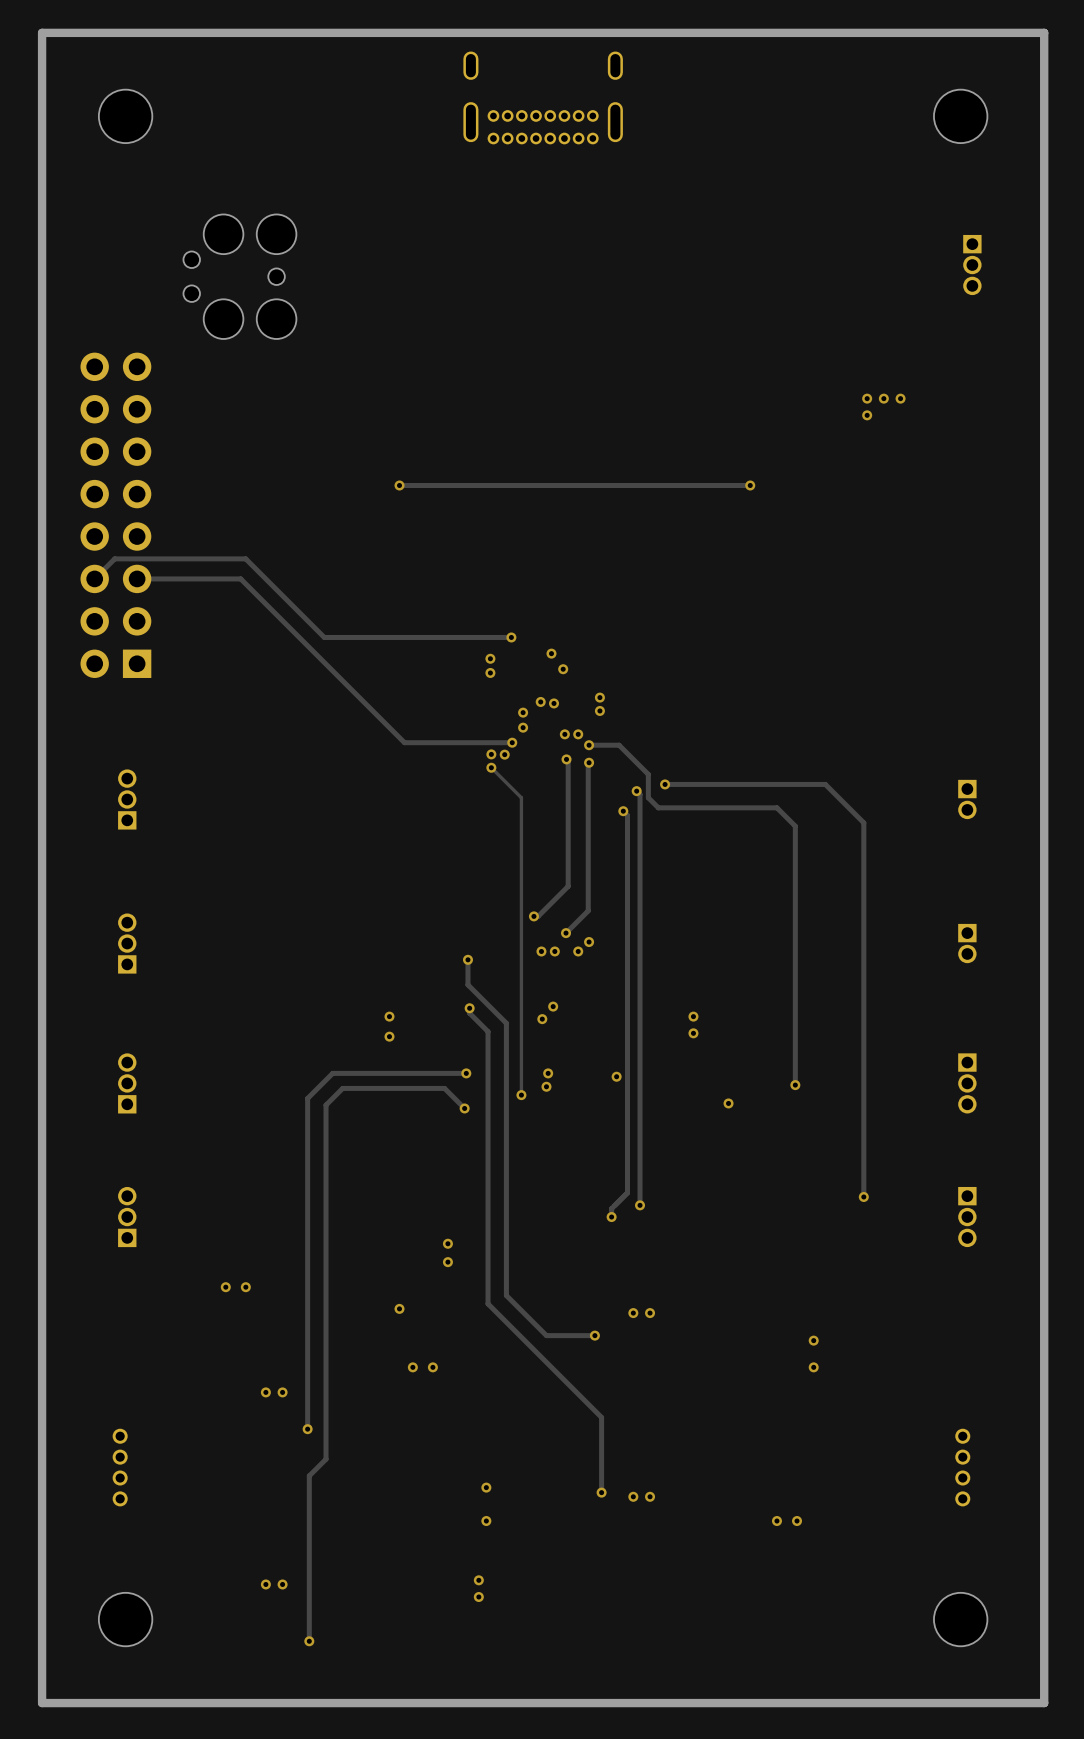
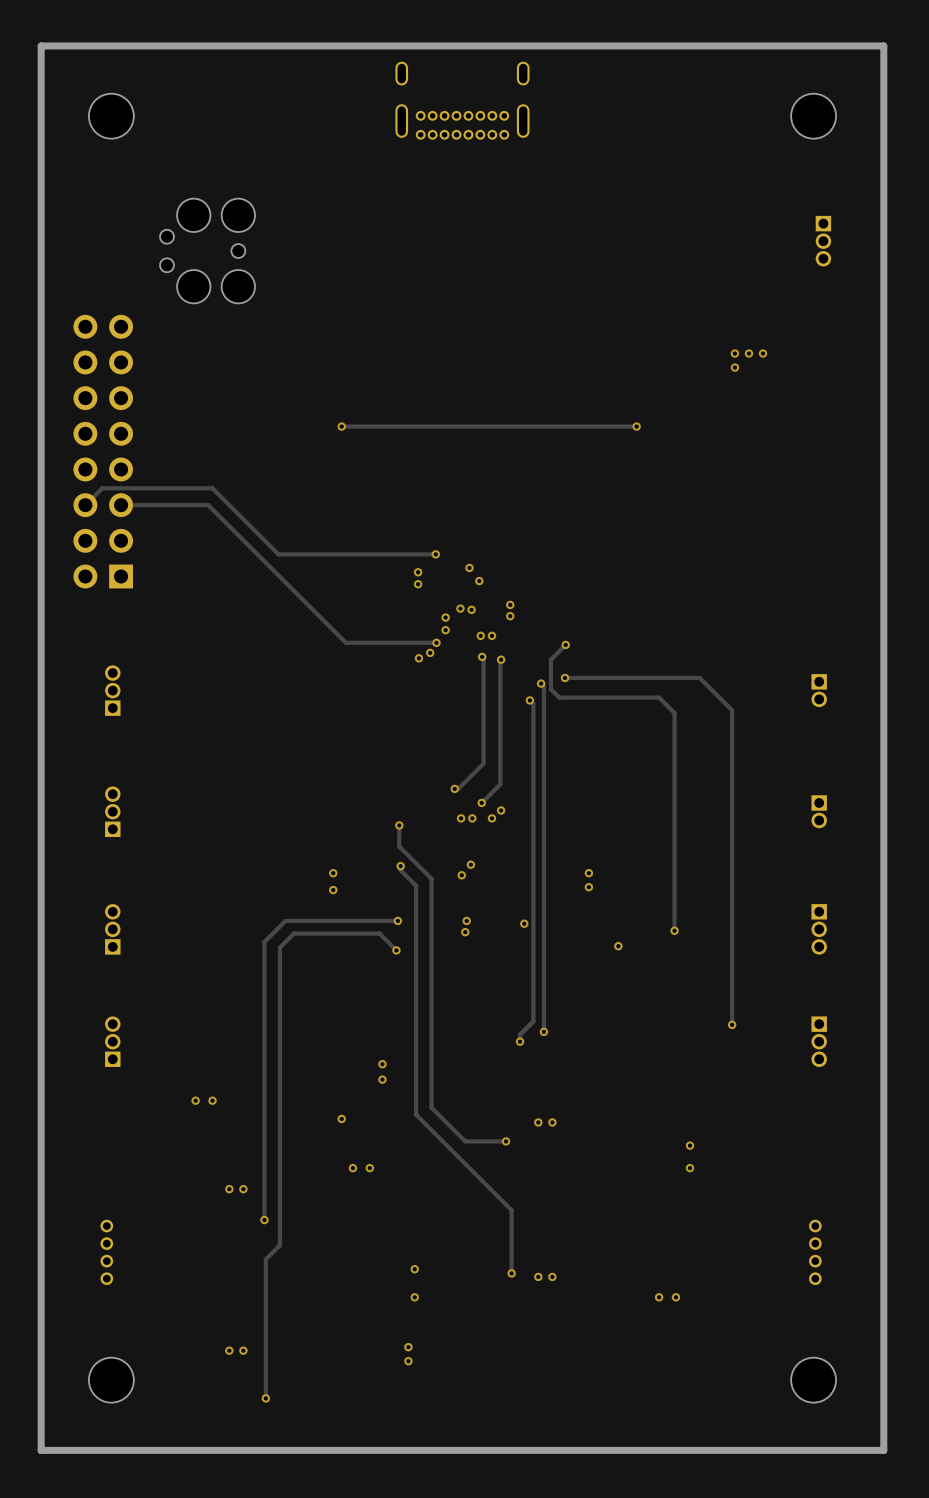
track: (589, 745) (619, 745) (648, 774) -> (565, 644) (550, 659) (550, 669)
via: (589, 745) -> none
via: none -> (565, 644)
via: (491, 754) -> none
via: none -> (418, 658)
track: (491, 767) (521, 797) (521, 1095) -> none
via: (491, 767) -> none
via: (521, 1095) -> none

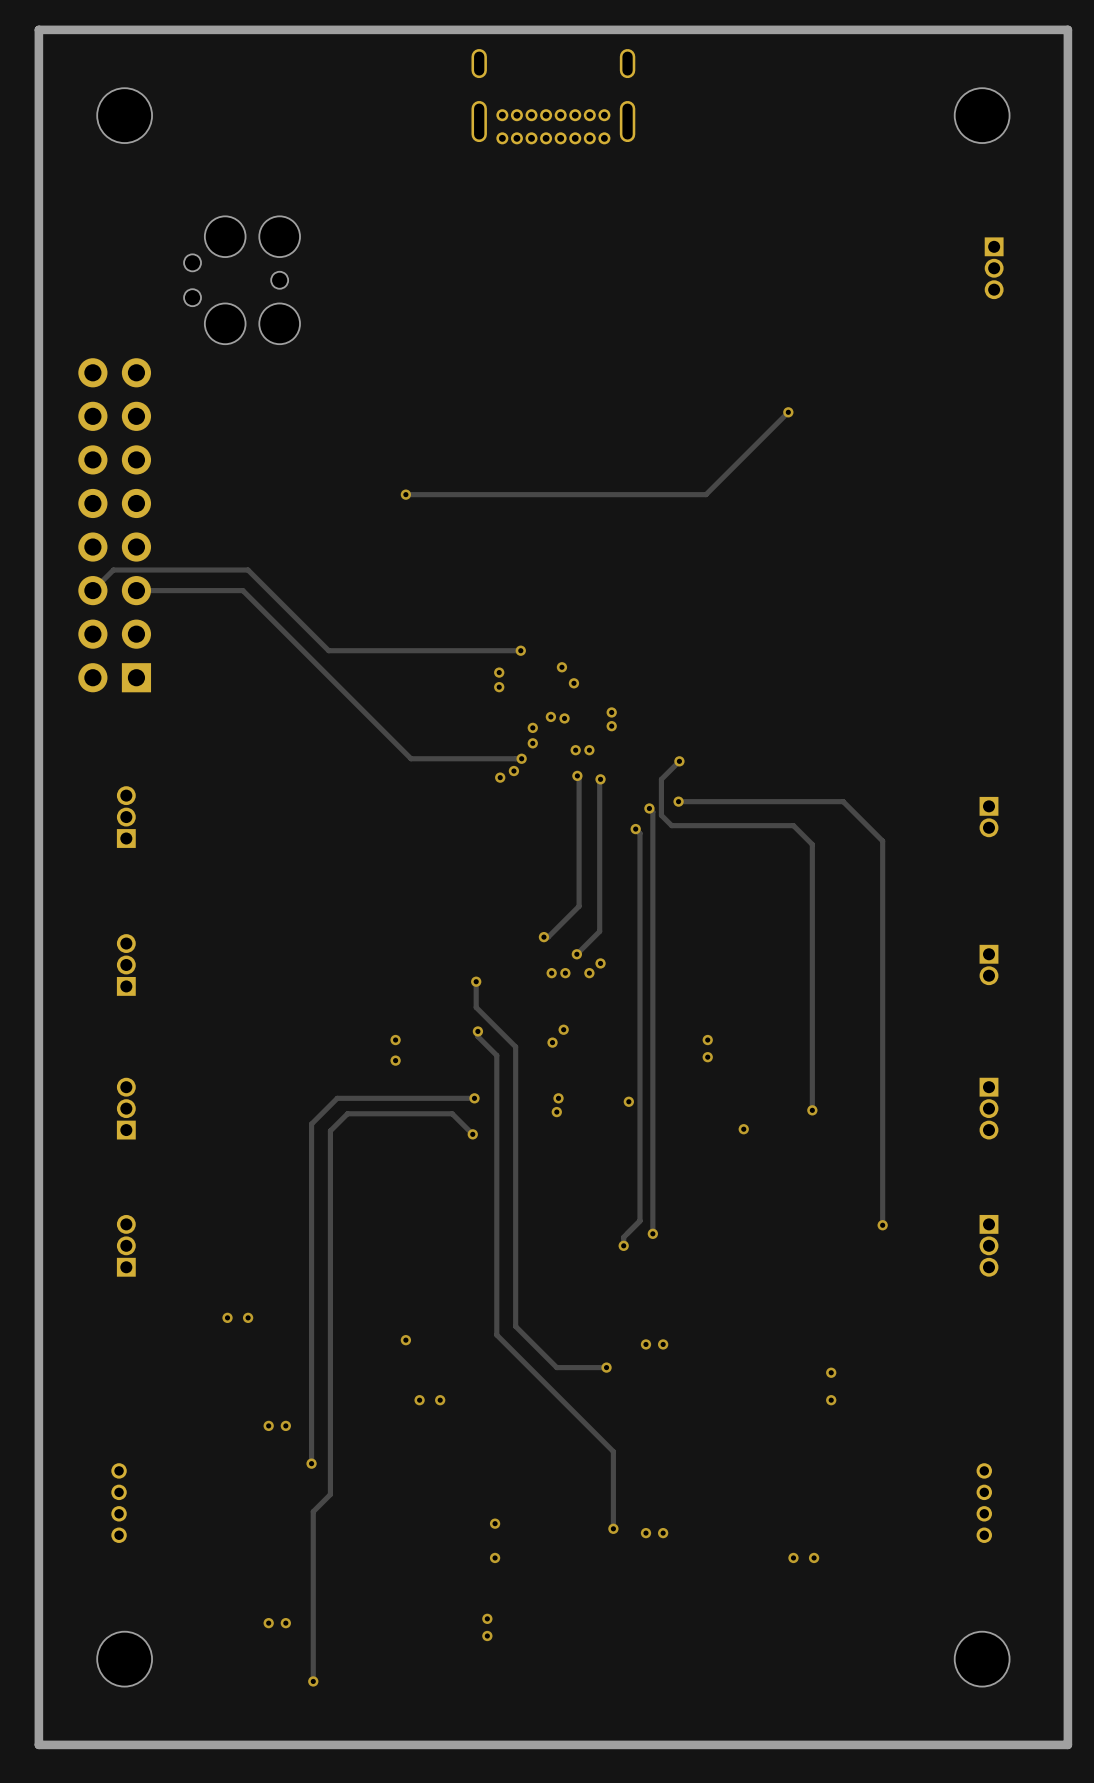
via: (734, 353) -> none
via: (748, 353) -> none
via: (763, 353) -> none
via: none -> (788, 412)
via: (734, 367) -> none
track: (636, 426) (587, 426) -> (788, 412) (706, 494)
via: (636, 426) -> none
via: (382, 1064) -> none
via: (382, 1079) -> none

